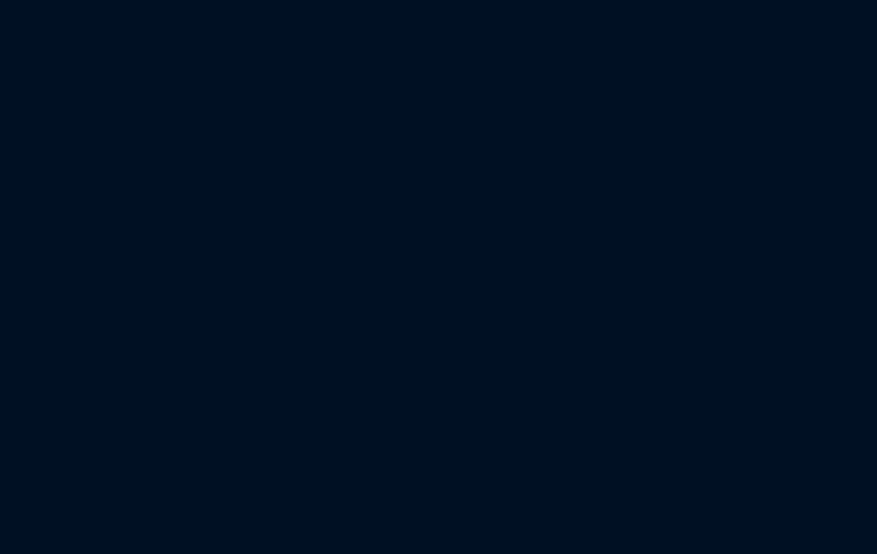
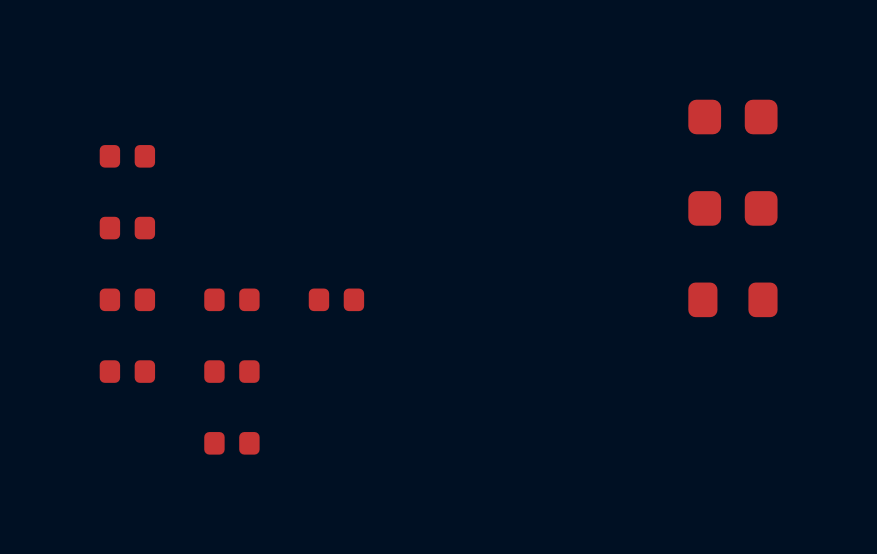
part: none -> (732, 117)
part: none -> (127, 156)
part: none -> (732, 208)
part: none -> (127, 228)
part: none -> (127, 299)
part: none -> (231, 299)
part: none -> (336, 299)
part: none -> (732, 299)
part: none -> (127, 371)
part: none -> (231, 371)
part: none -> (231, 443)

